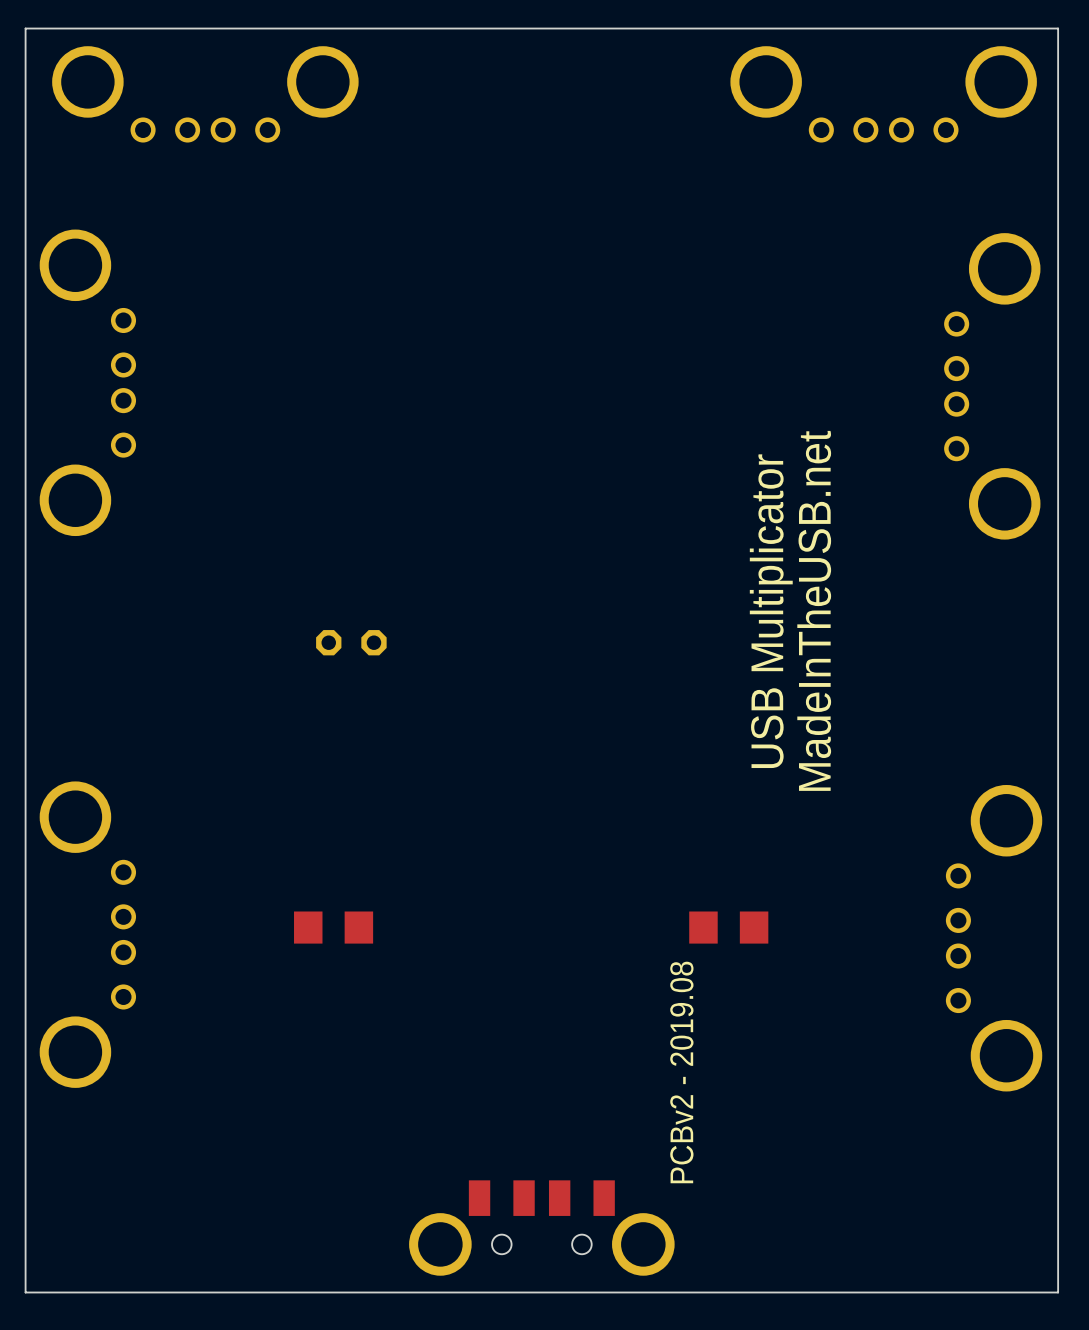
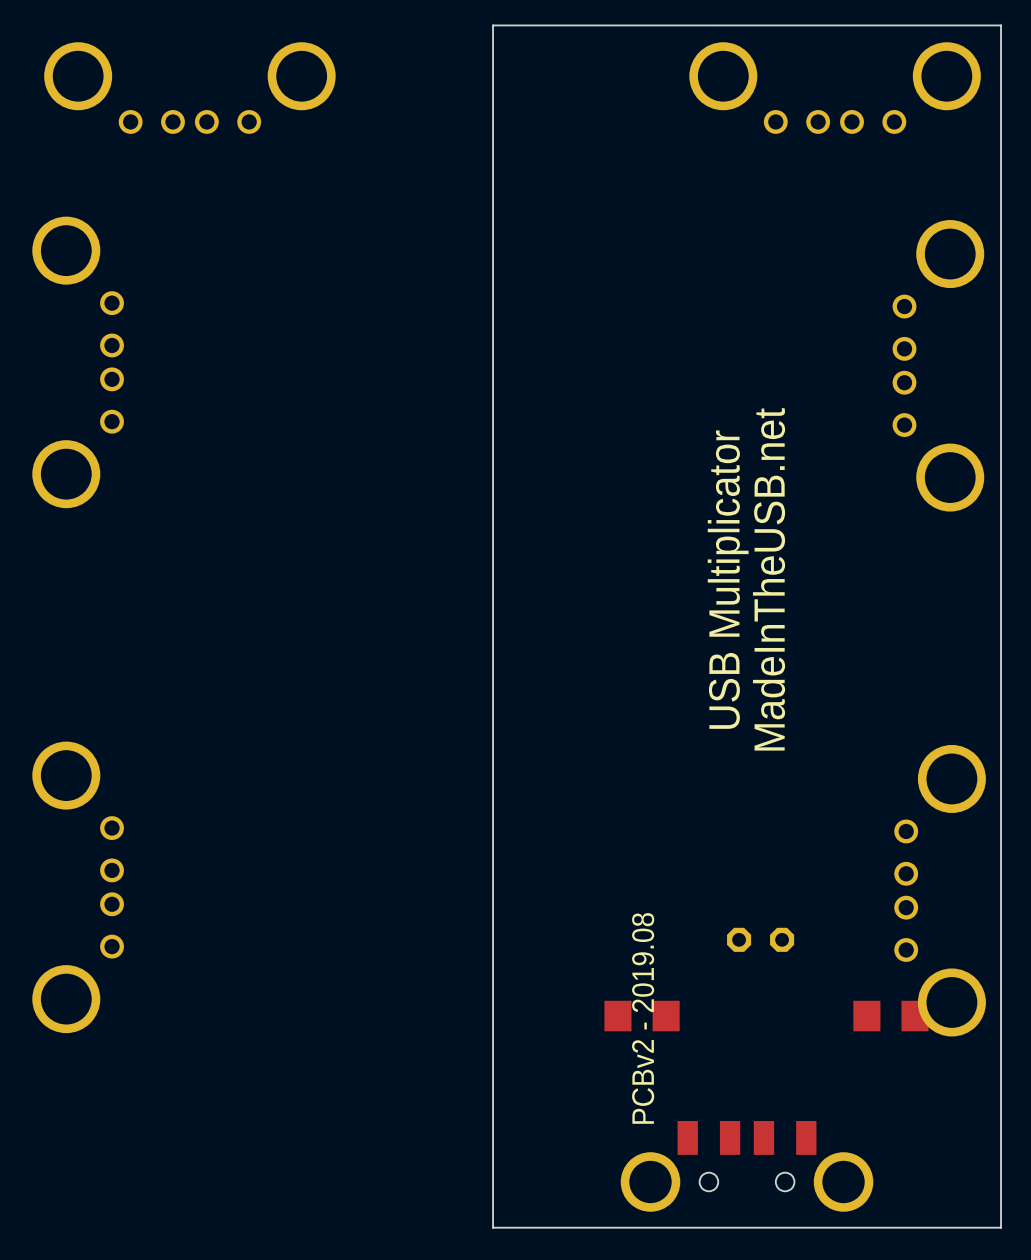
board edge: (524, 28) (25, 28) (25, 1292) (524, 1292) -> (493, 25) (493, 1227)
part: (351, 642) -> none
part: (333, 927) -> none
part: (728, 927) -> none
part: none -> (760, 939)
part: none -> (642, 1016)
part: none -> (890, 1016)
part position: (541, 1228) -> (747, 1166)

